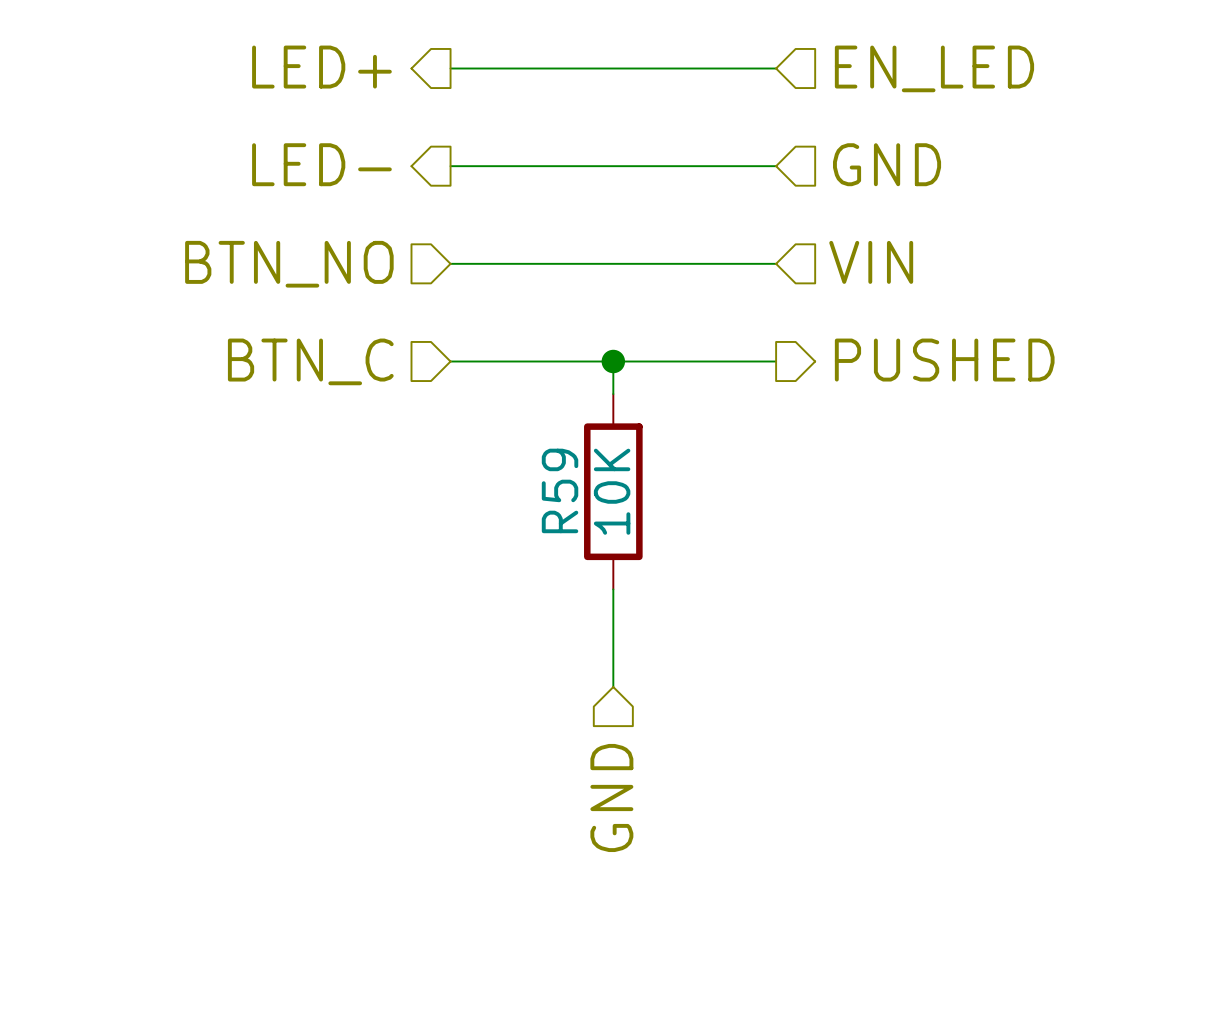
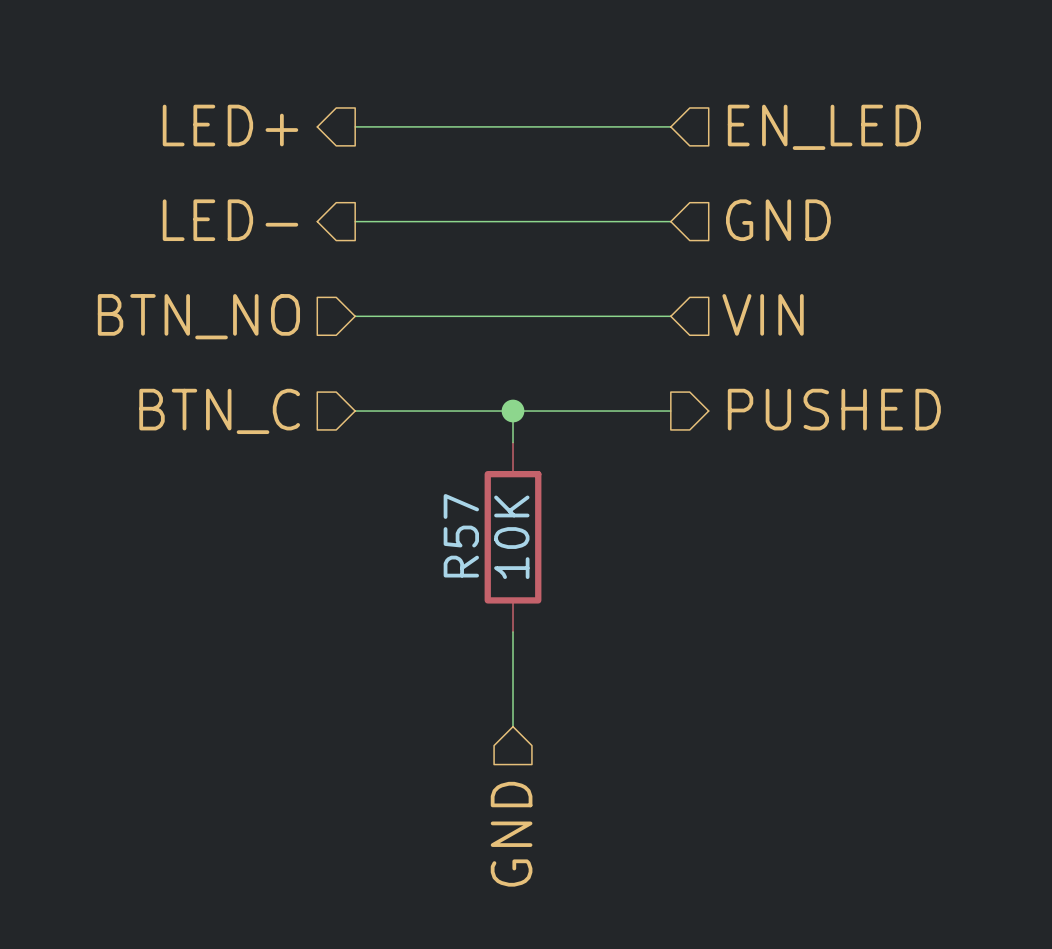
R59 name: R59 (560, 490) -> R57 (461, 535)

